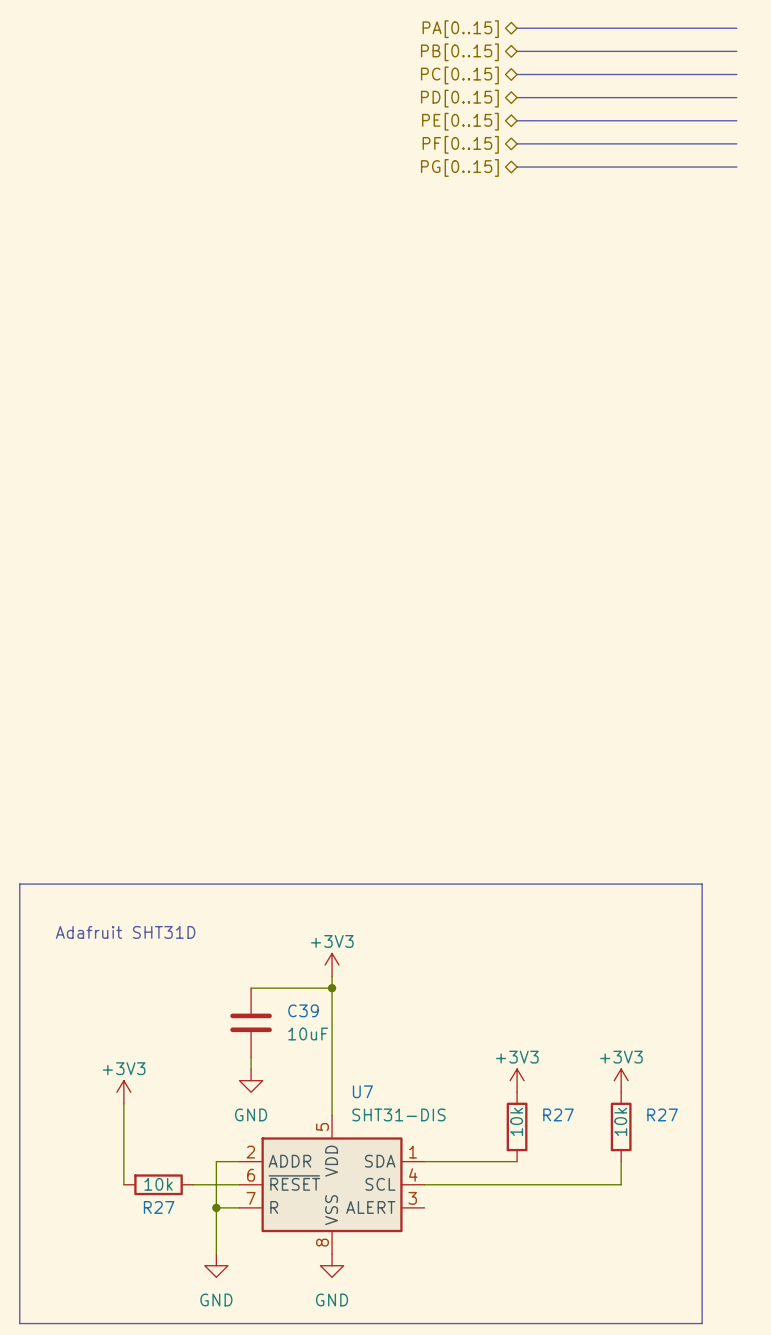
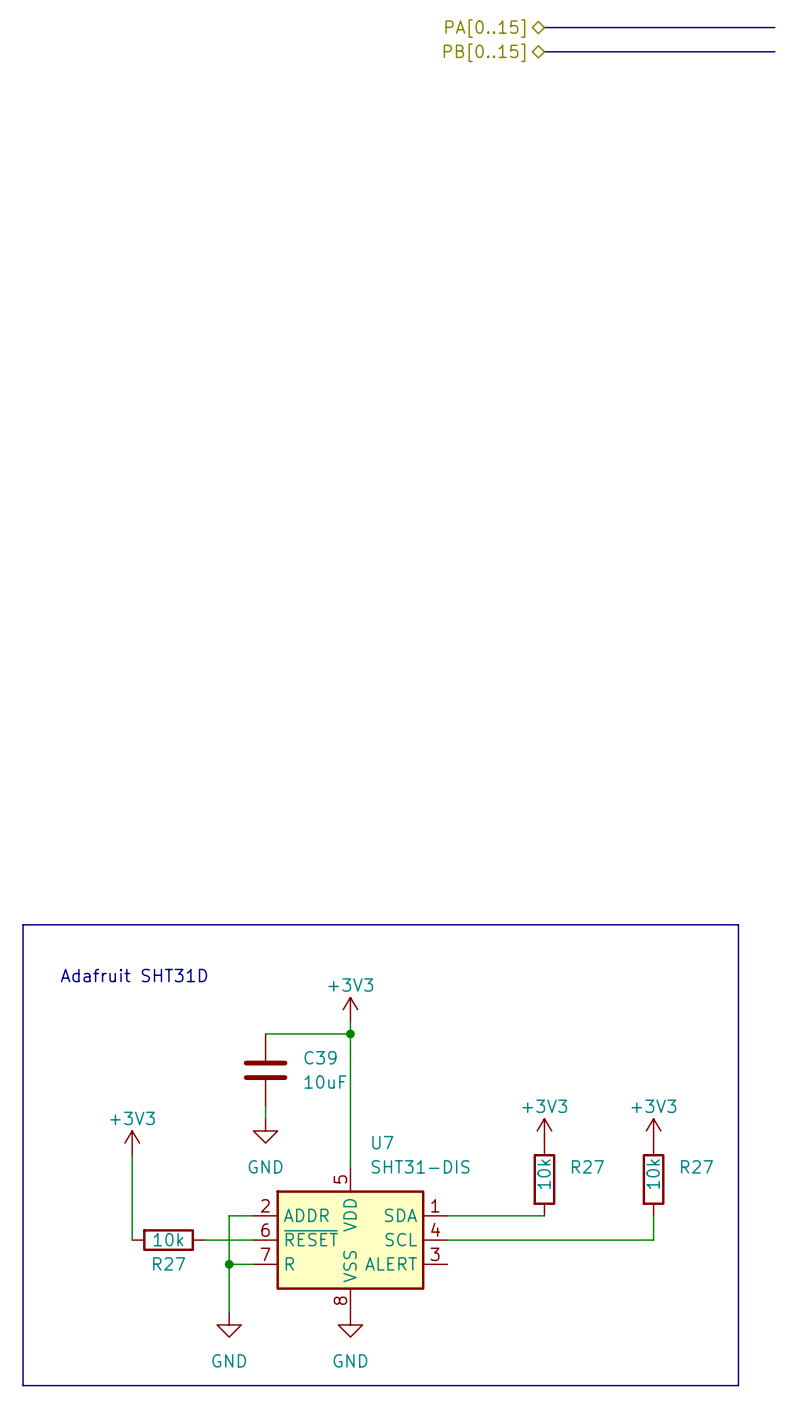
bus: (517, 74) (736, 74) -> none
hierarchical label: PC[0..15] (459, 75) -> none
bus: (517, 97) (736, 97) -> none
hierarchical label: PD[0..15] (459, 98) -> none
bus: (517, 120) (736, 120) -> none
hierarchical label: PE[0..15] (460, 121) -> none
bus: (517, 143) (736, 143) -> none
hierarchical label: PF[0..15] (460, 144) -> none
hierarchical label: PG[0..15] (459, 167) -> none
bus: (517, 167) (736, 167) -> none

